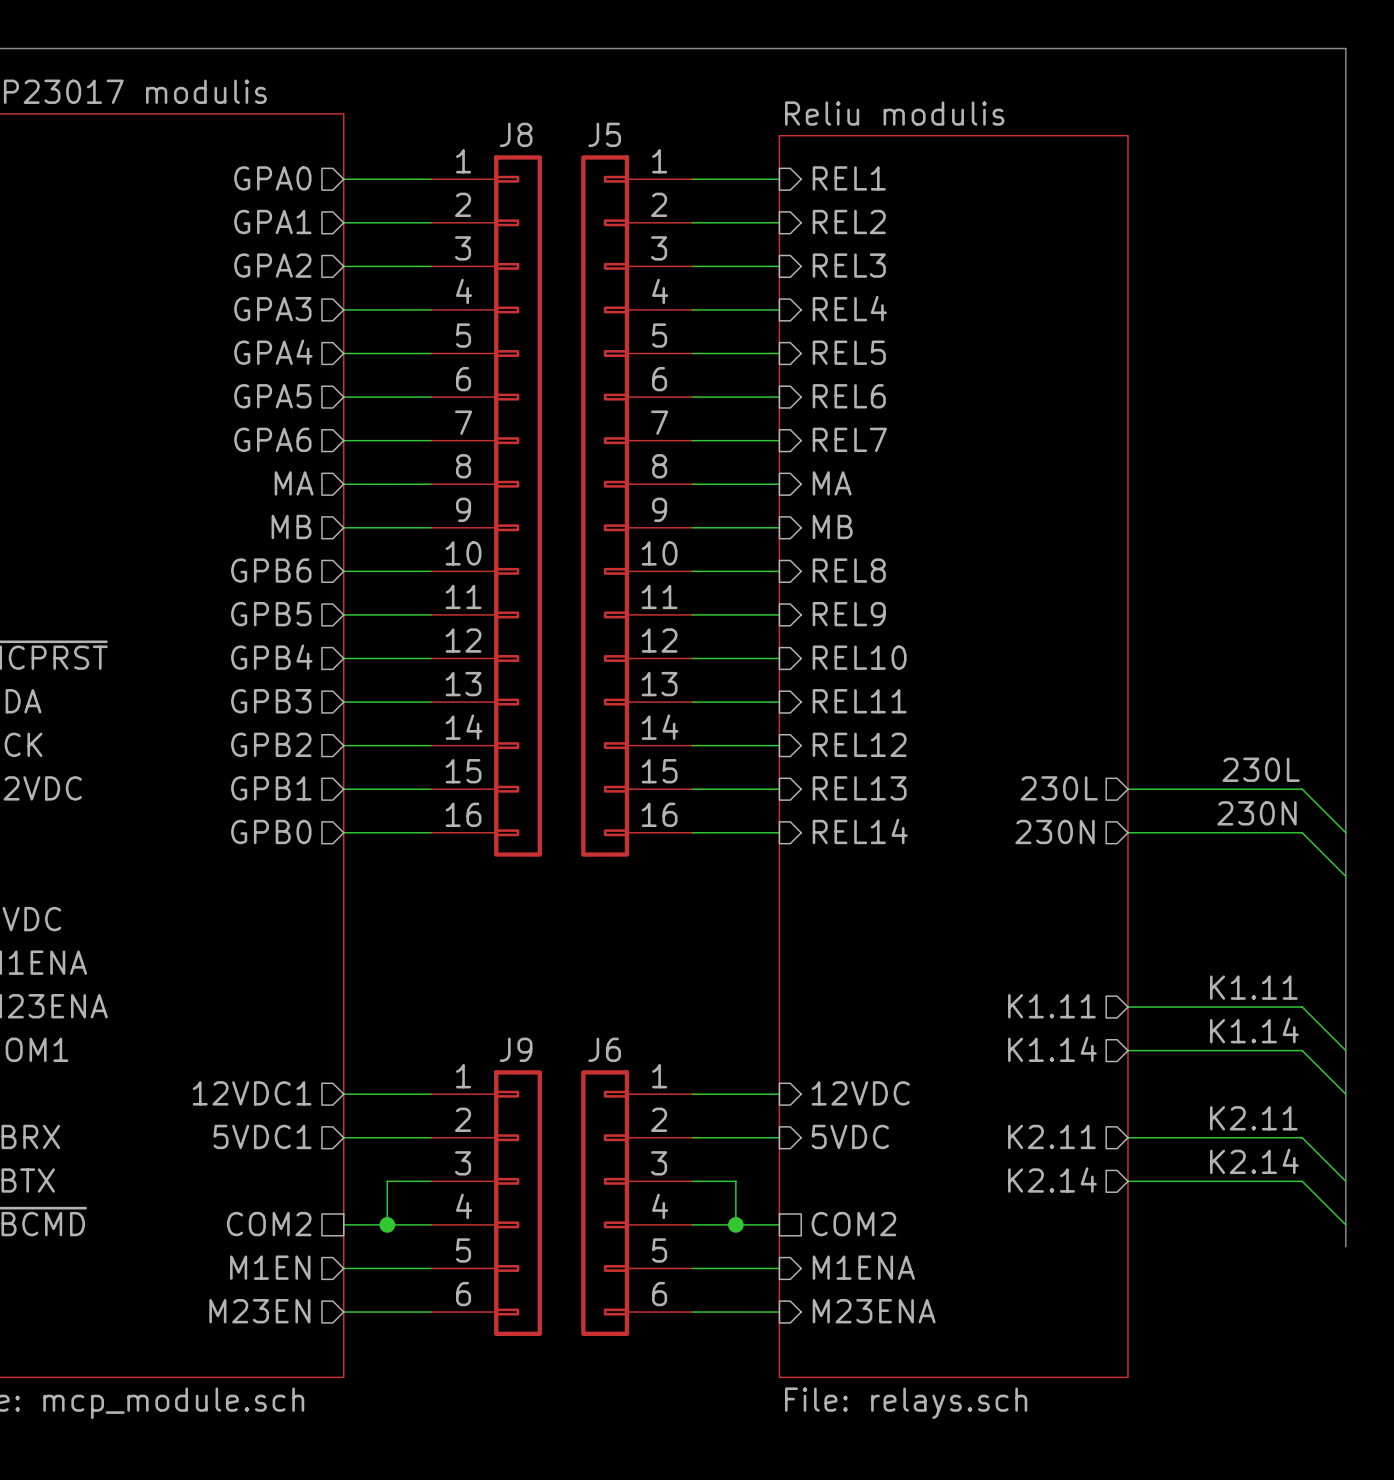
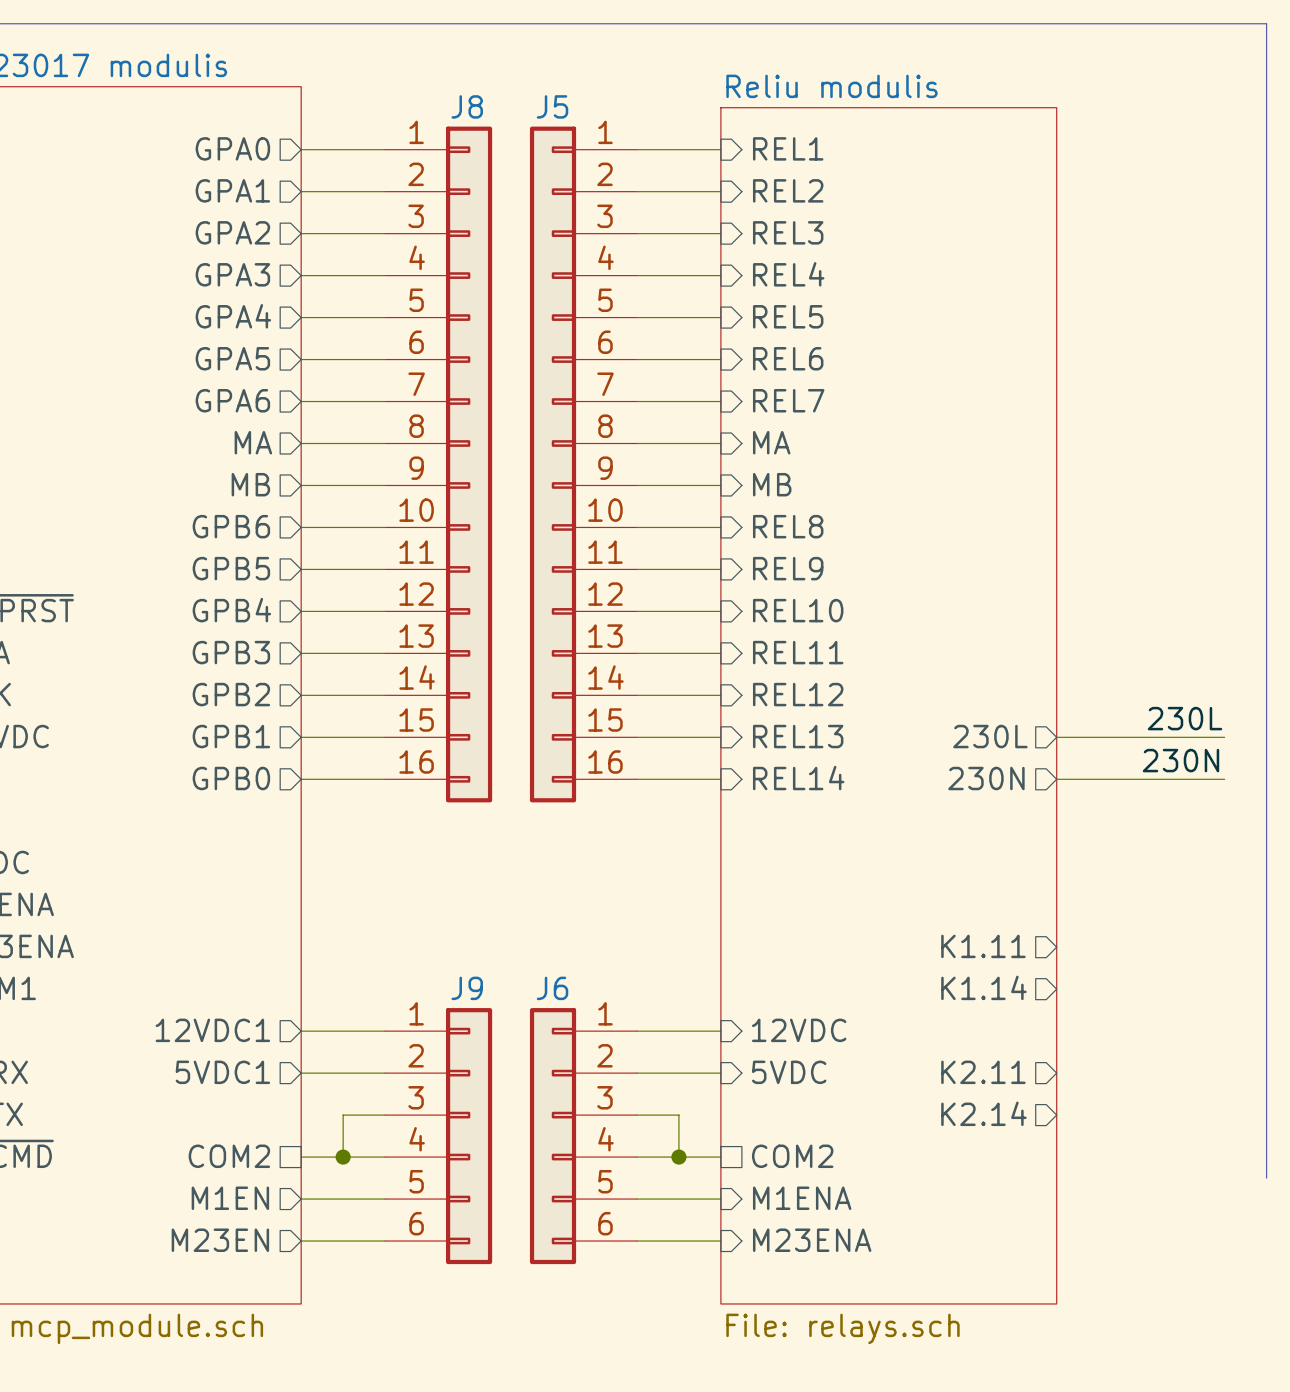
wire: (1302, 789) (1345, 832) -> none
wire: (1302, 832) (1345, 876) -> none
label: K1.11 (1253, 987) -> none
wire: (1127, 1007) (1302, 1007) (1345, 1050) -> none
label: K1.14 (1254, 1030) -> none
wire: (1127, 1050) (1302, 1050) (1345, 1094) -> none
label: K2.11 (1253, 1118) -> none
wire: (1127, 1137) (1302, 1137) (1345, 1181) -> none
label: K2.14 (1254, 1161) -> none
wire: (1127, 1181) (1302, 1181) (1345, 1224) -> none

